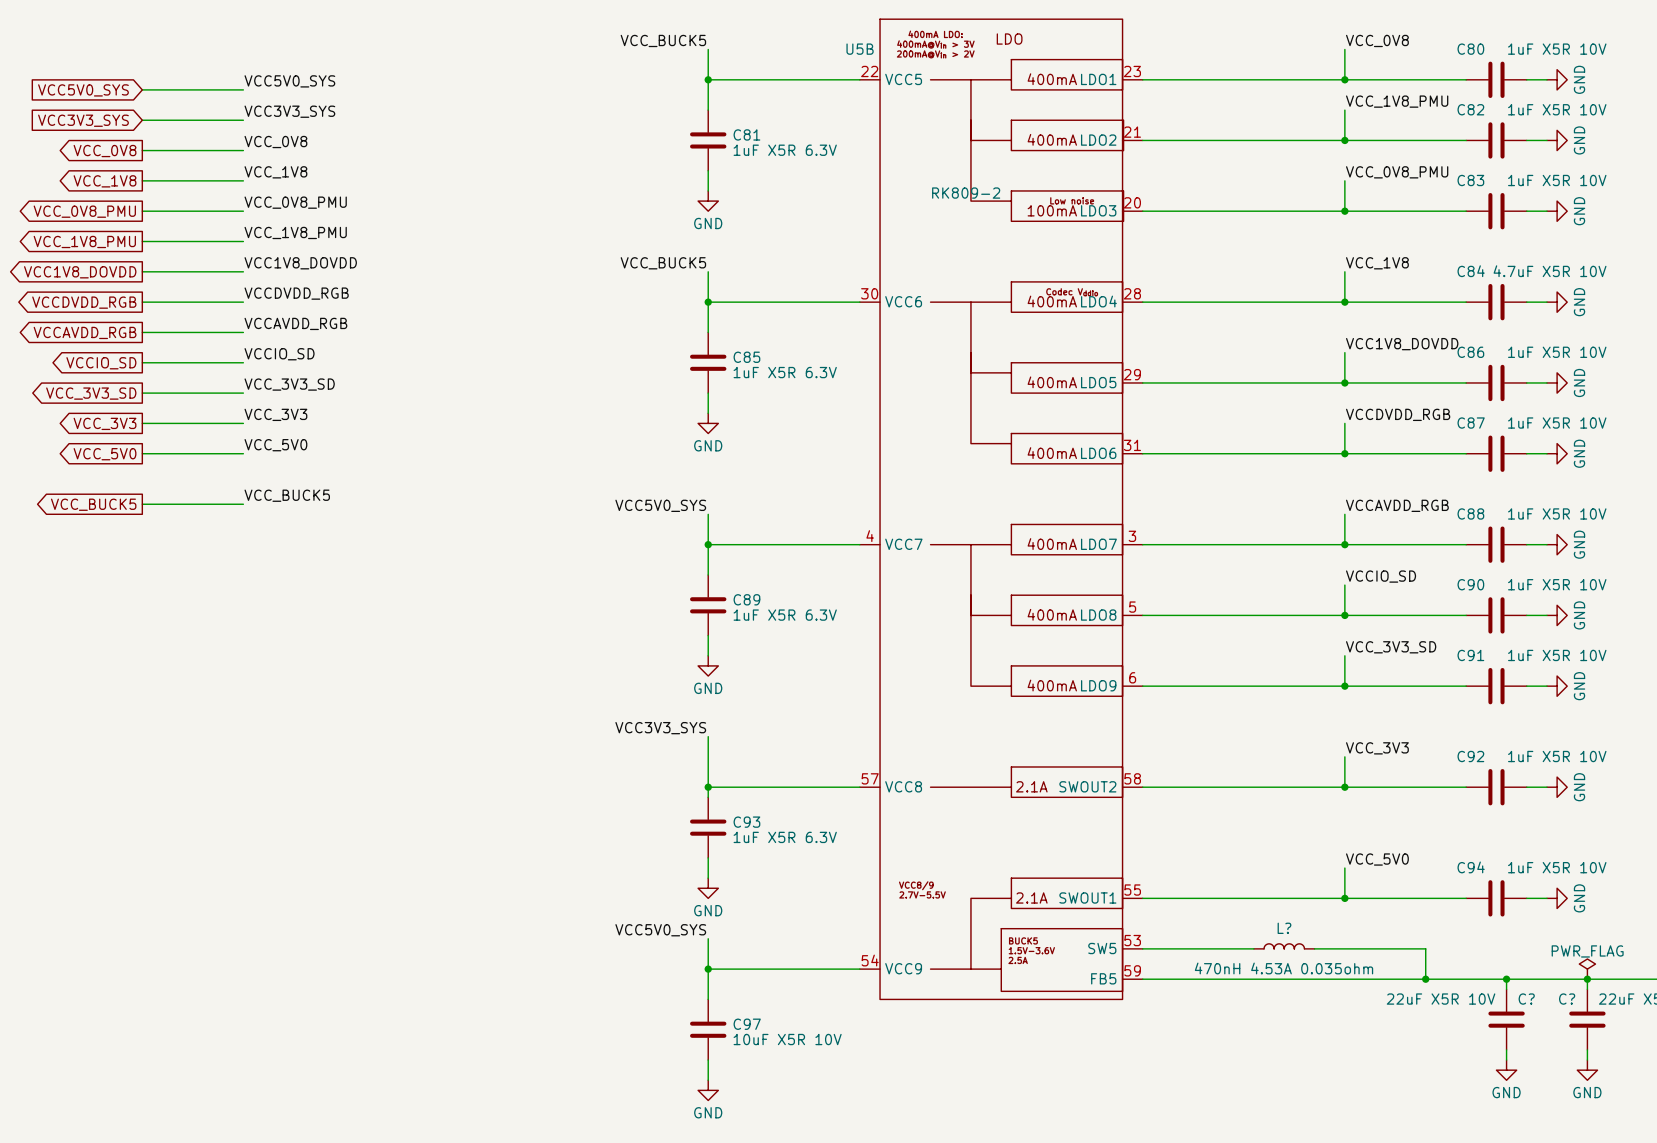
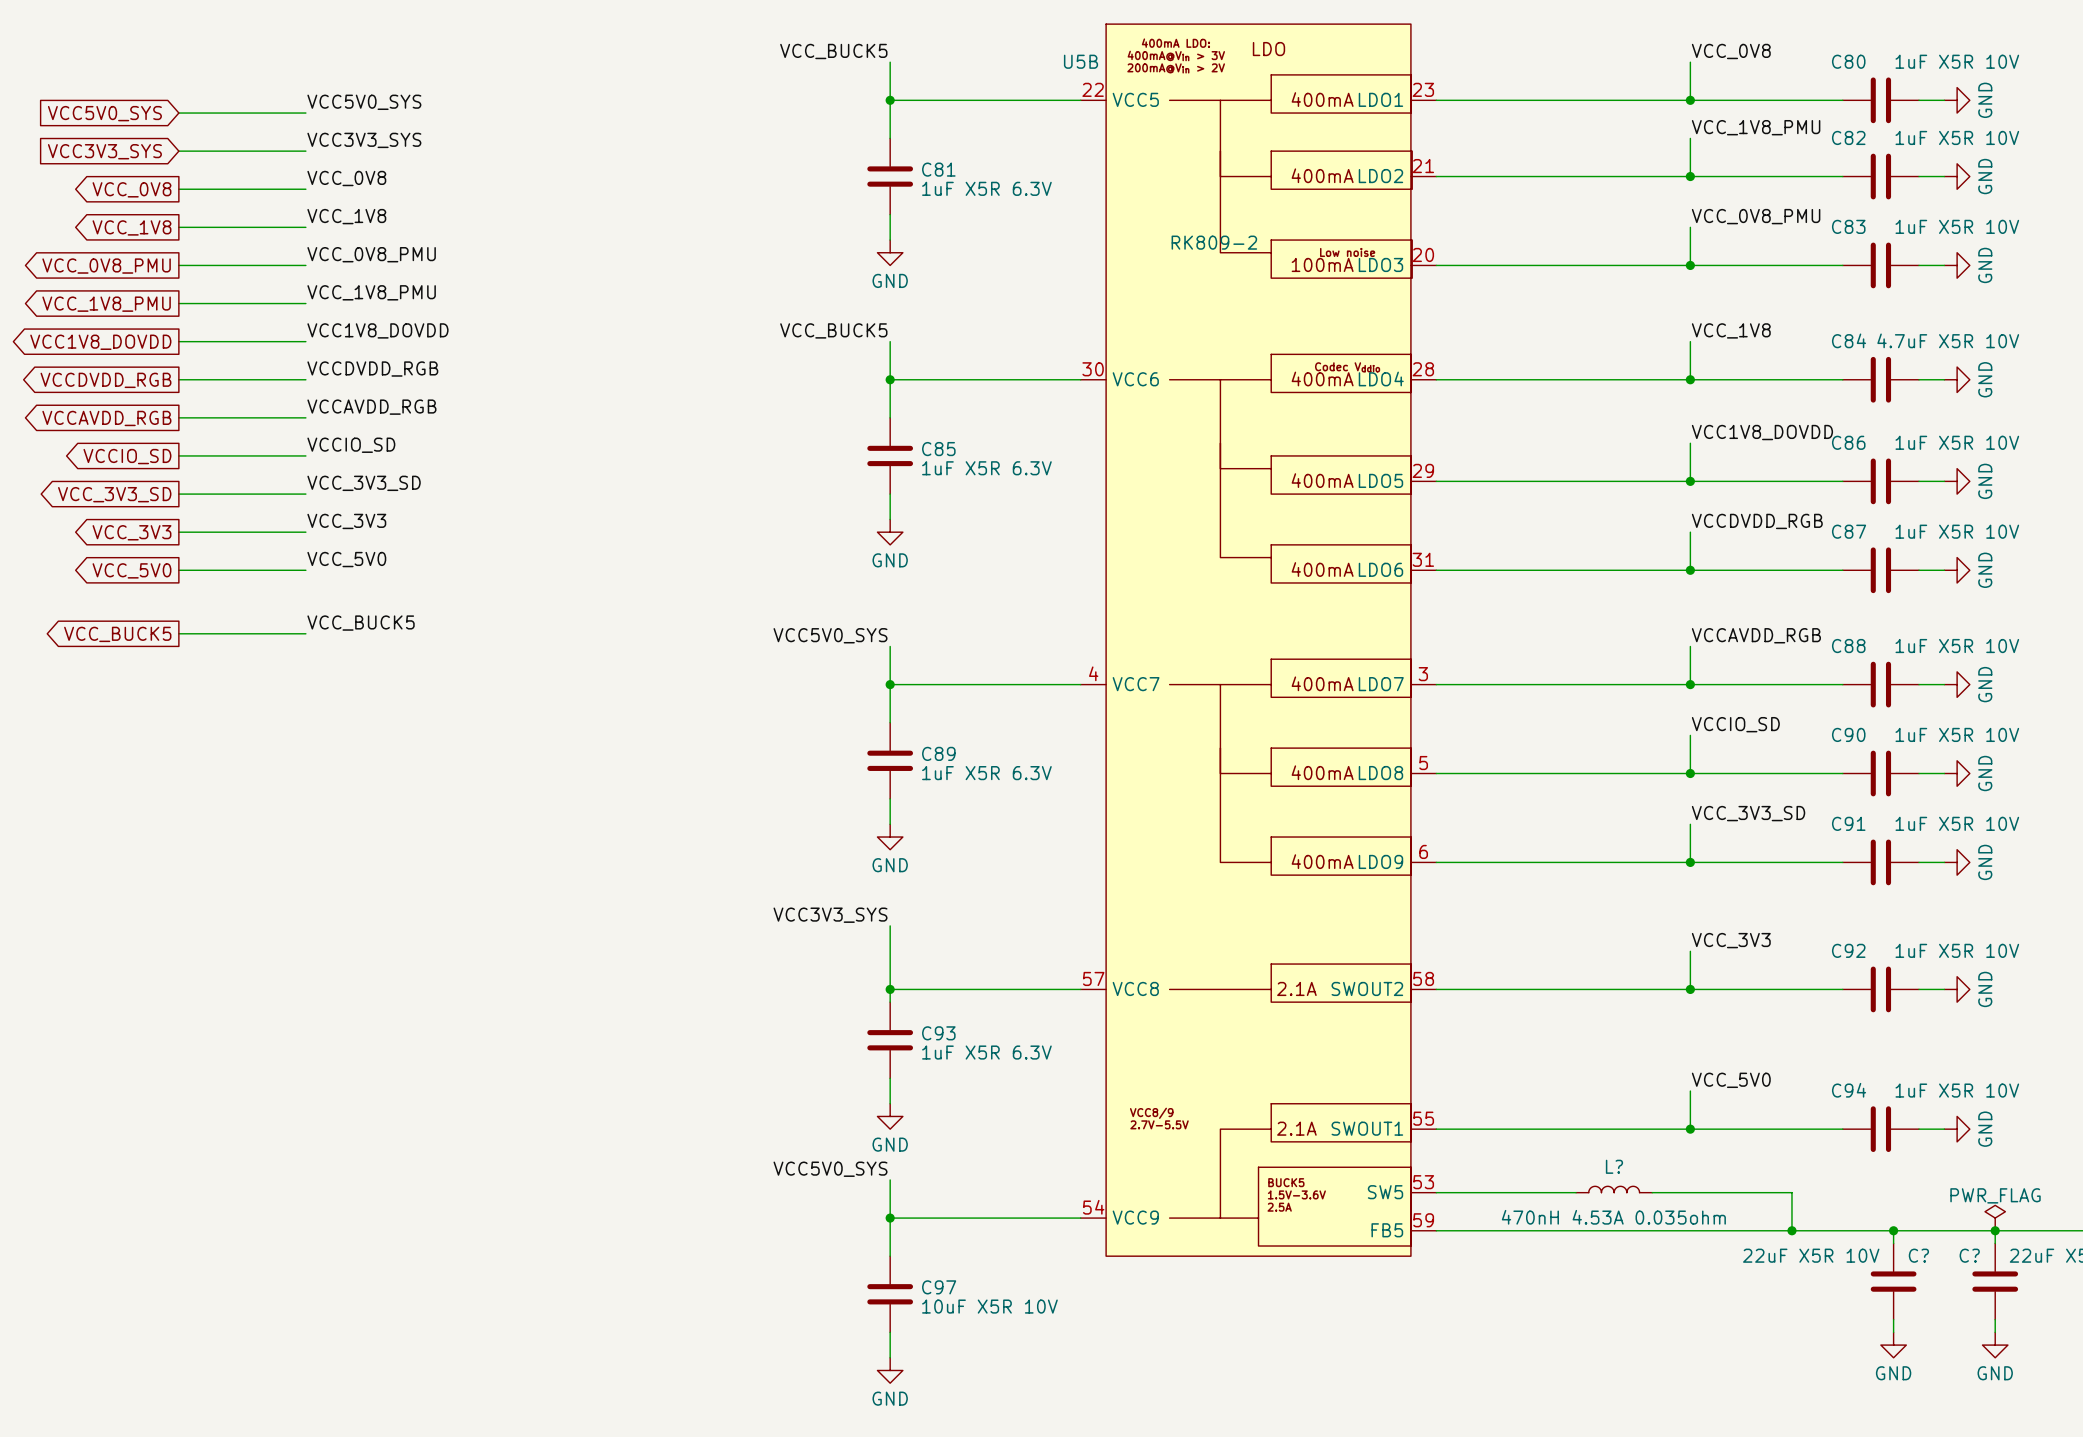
U5B symbol: [859, 19, 1143, 1000] -> [1080, 24, 1437, 1257]

